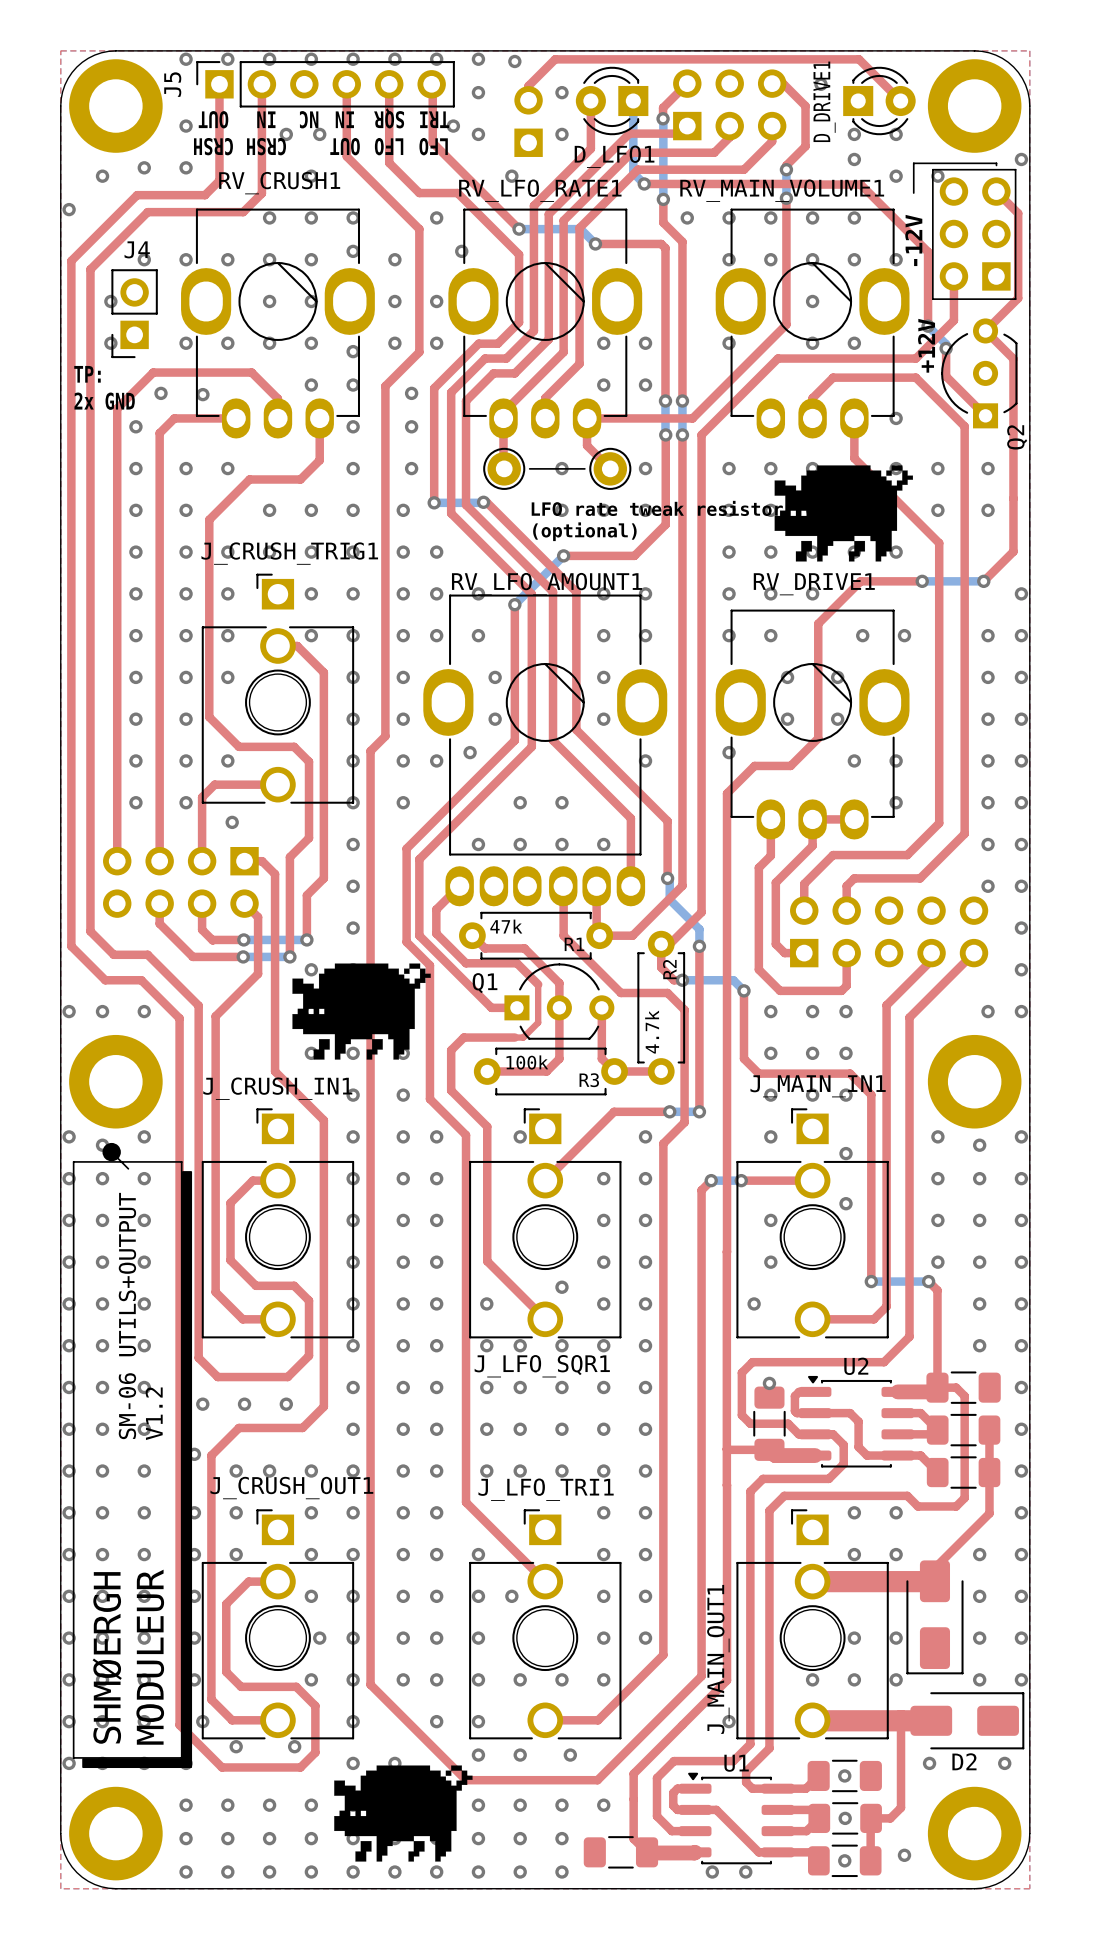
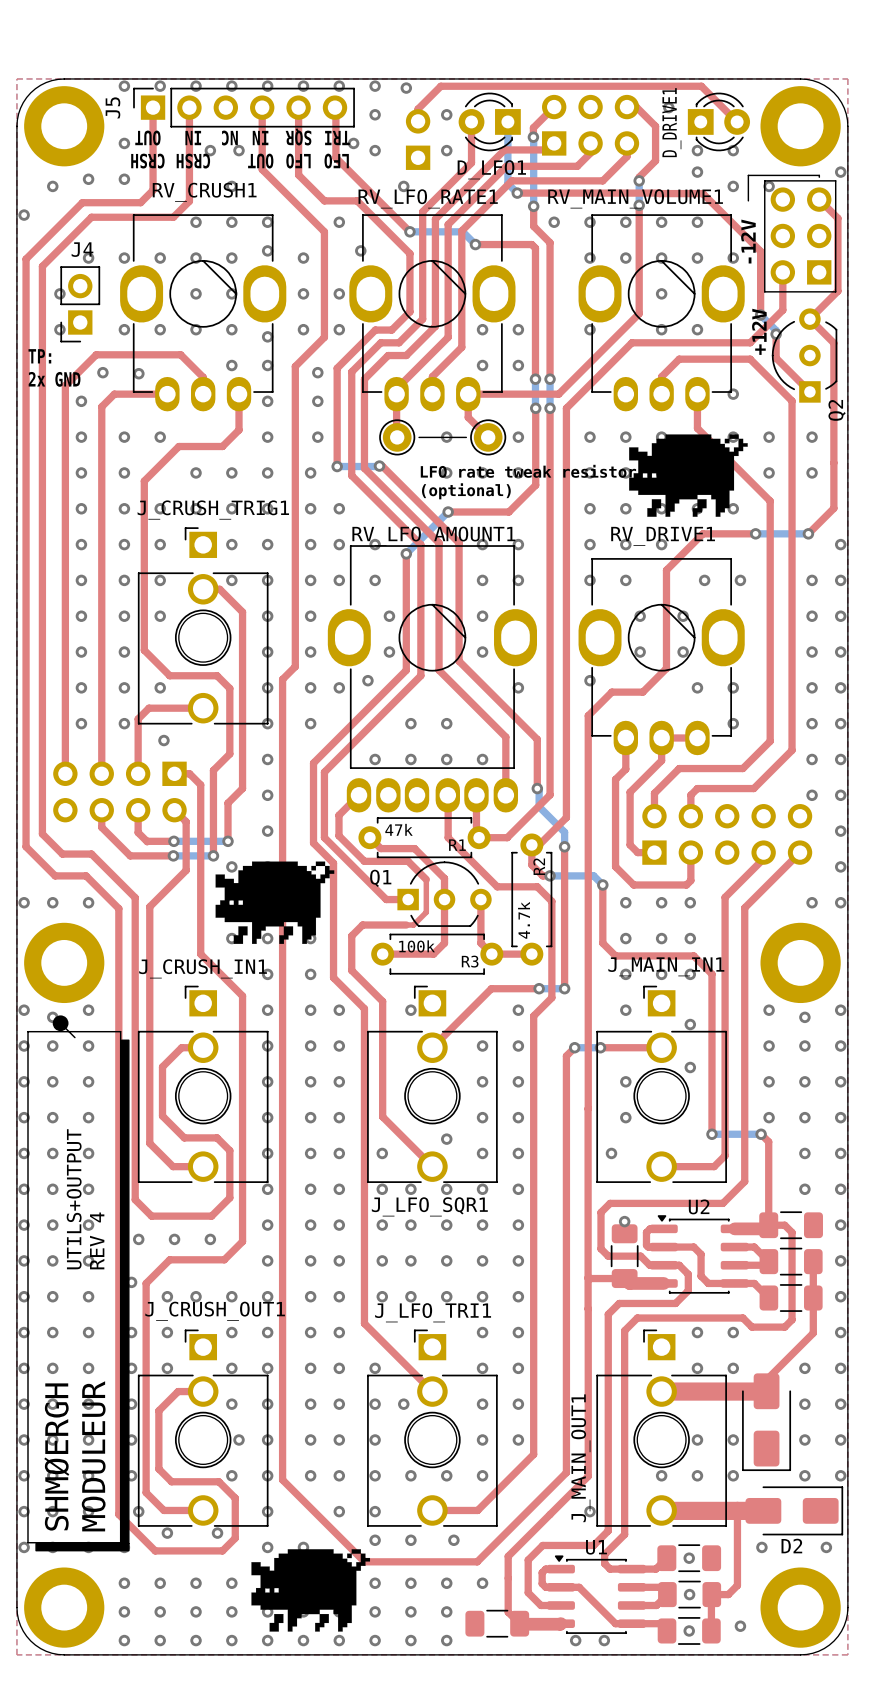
text: SM-06 UTILS+OUTPUT (127, 1316) -> UTILS+OUTPUT (74, 1199)
text: V1.2 (154, 1413) -> REV 4 (97, 1240)

